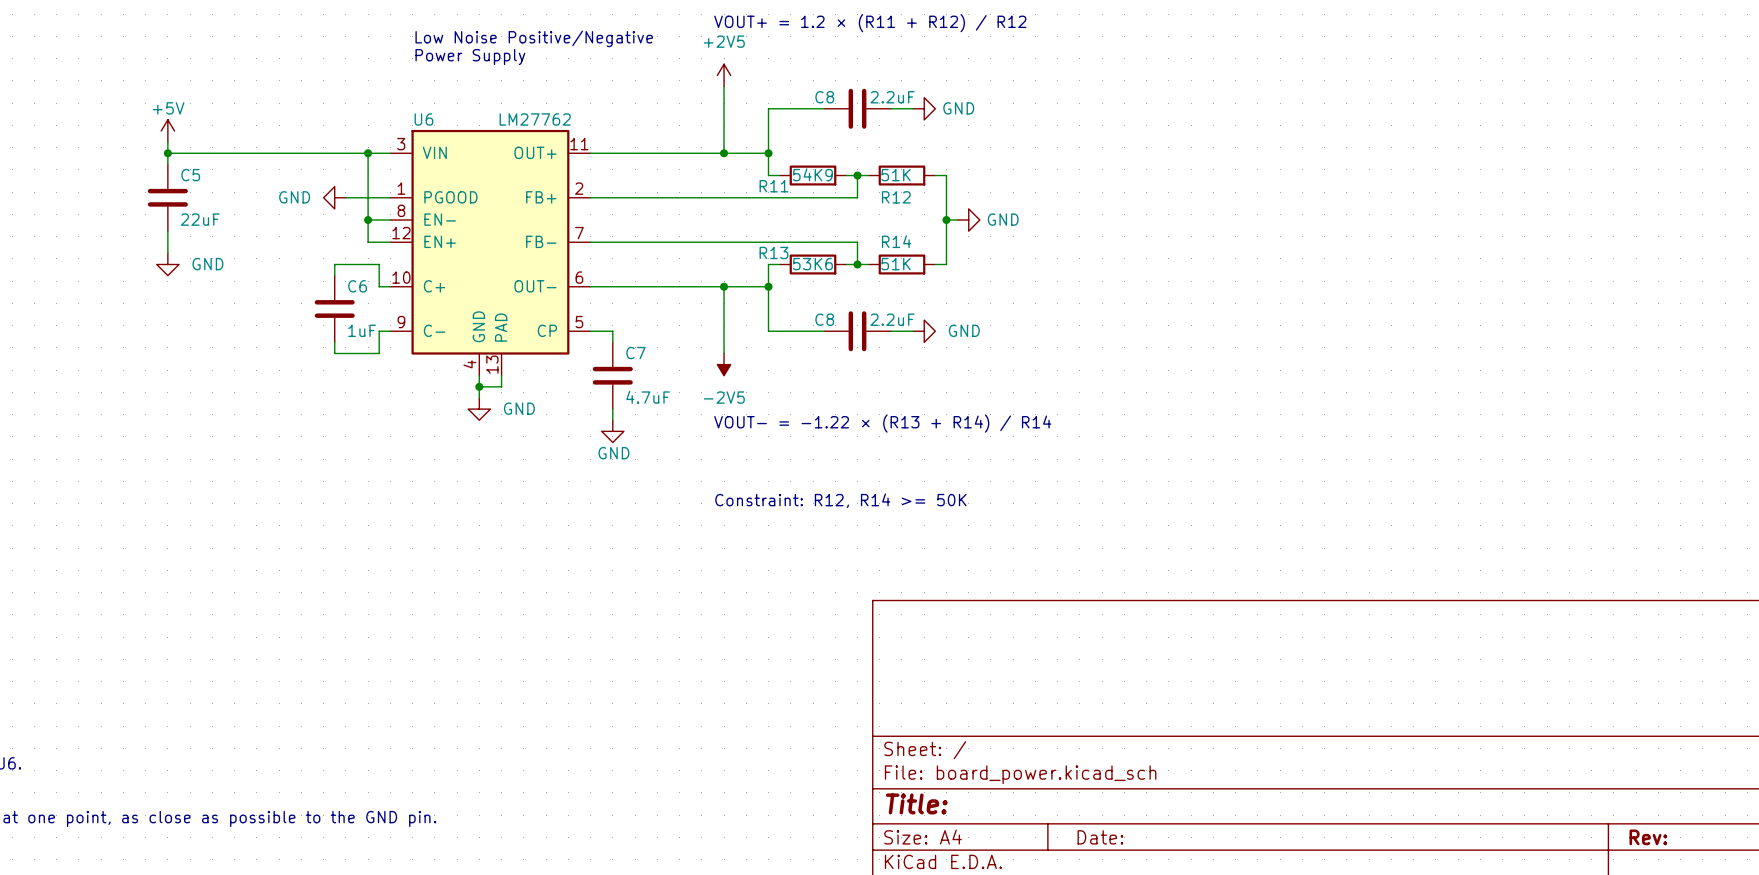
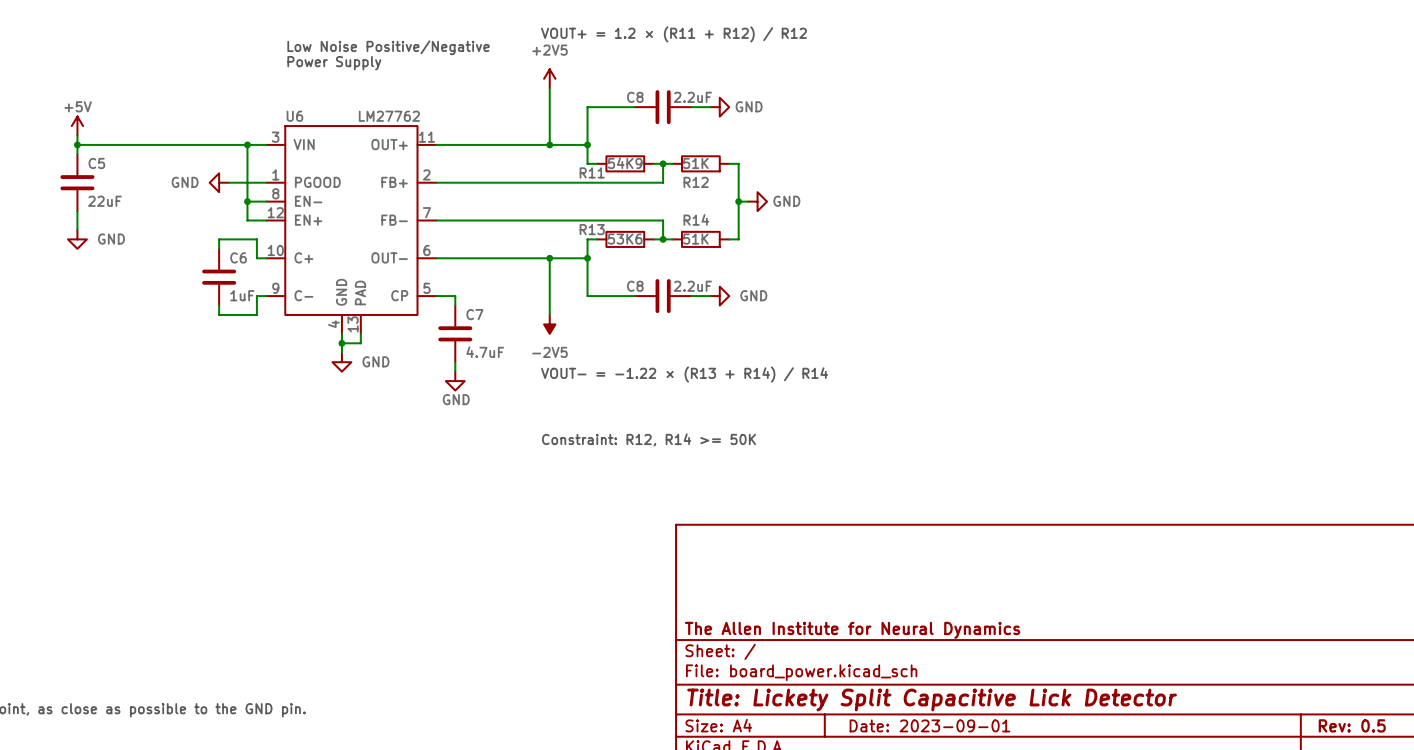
title block: none -> The Allen Institute for Neural Dynamics (852, 630)
title block: Title: (916, 803) -> Title: Lickety Split Capacitive Lick Detector (932, 699)
title block: Date: (1100, 837) -> Date: 2023-09-01 (929, 725)
title block: Rev: (1648, 837) -> Rev: 0.5 (1352, 725)

